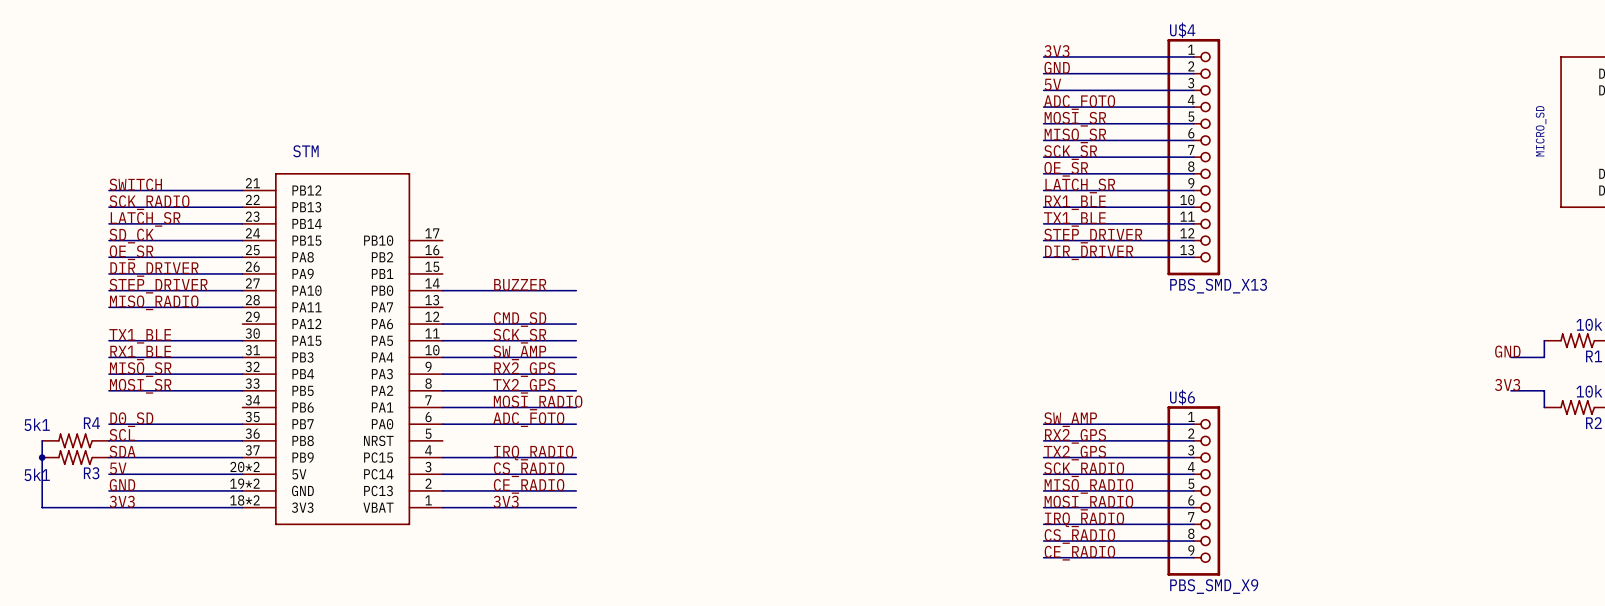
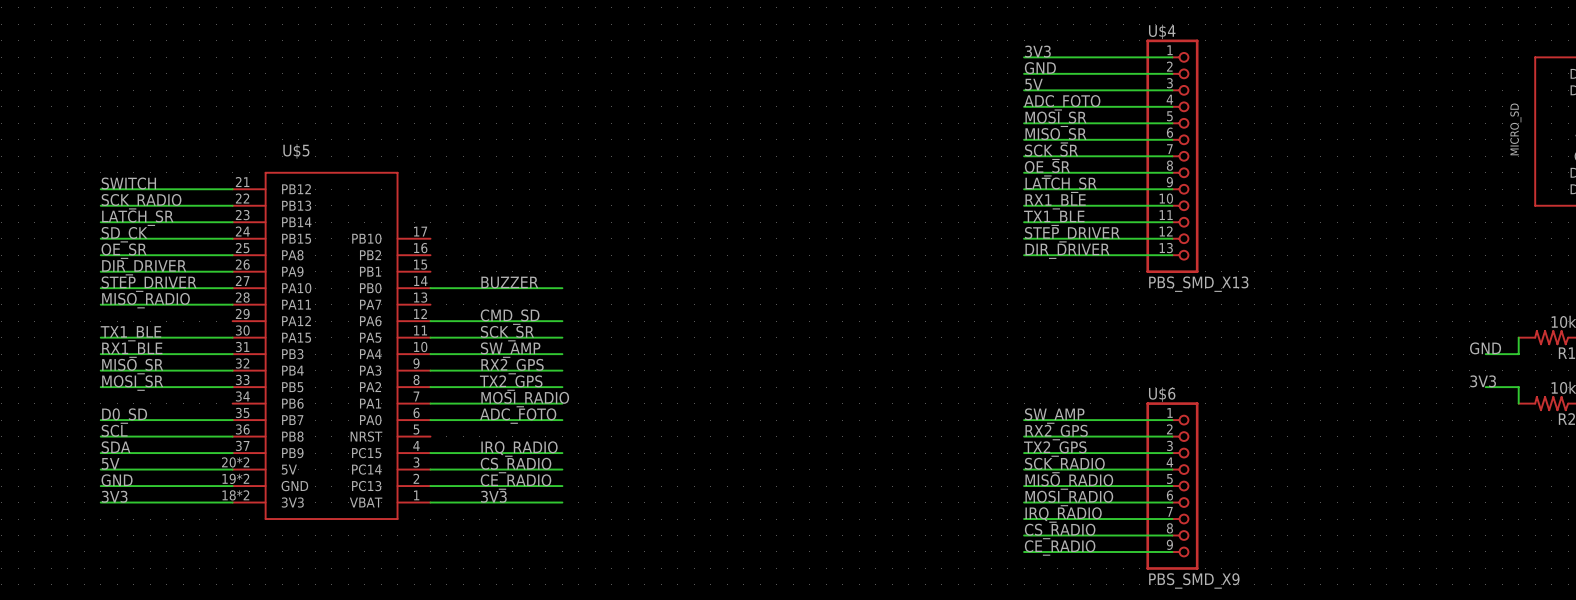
STM name: STM (305, 151) -> U$5 (296, 151)
wire: (42, 440) (42, 507) (108, 507) -> none
R4: 5k1 (75, 440) -> none
junction: (42, 457) -> none
R3: 5k1 (75, 457) -> none

